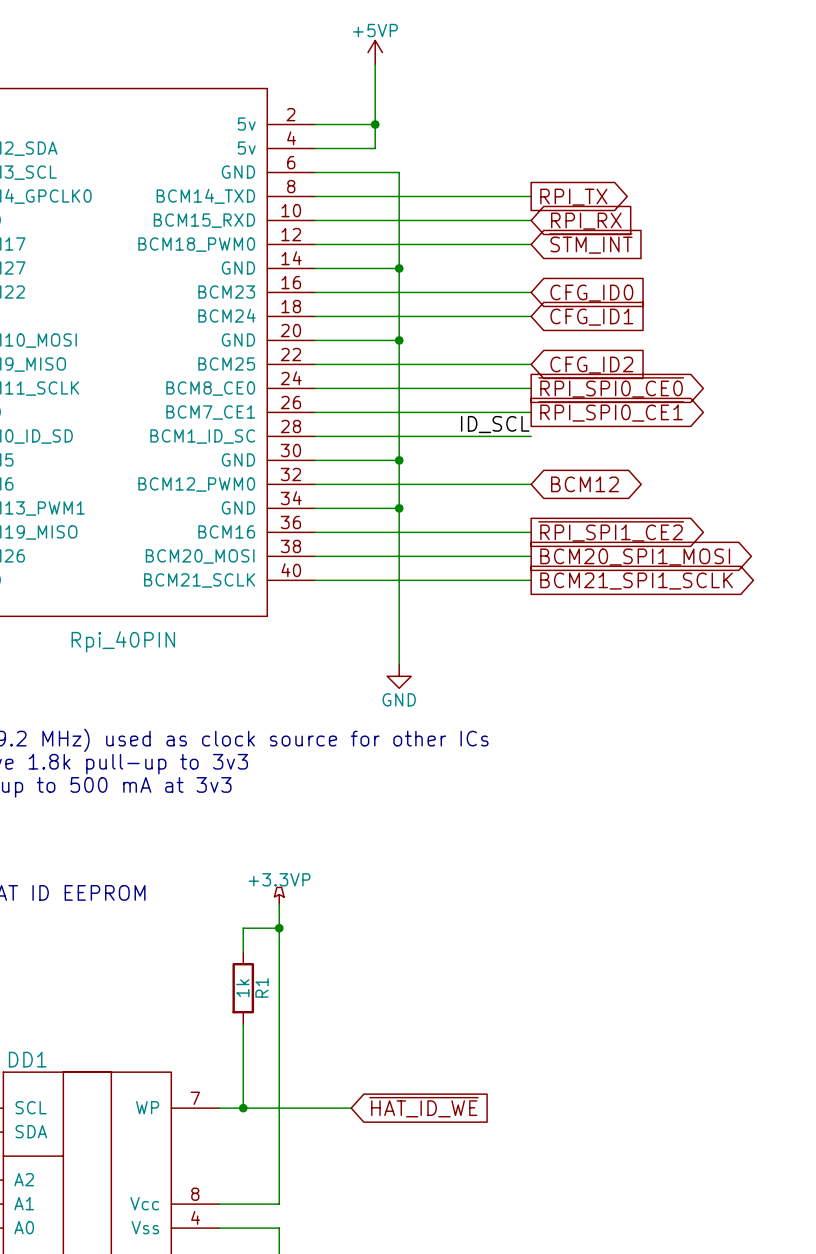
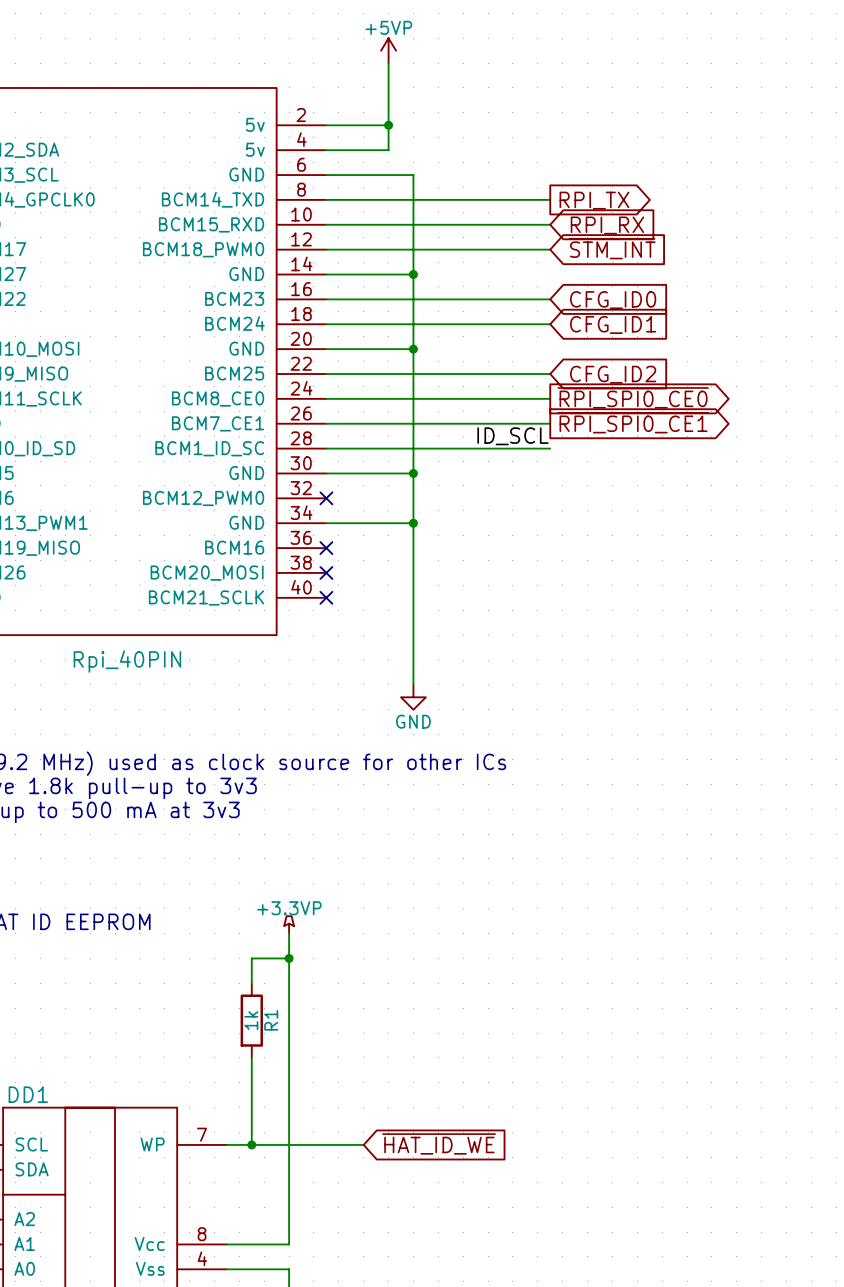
wire: (315, 484) (531, 484) -> none
no-connect mark: none -> (326, 498)
global label: BCM12 (584, 484) -> none
global label: ~{RPI_SPI1_CE2} (611, 531) -> none
wire: (315, 532) (531, 532) -> none
no-connect mark: none -> (326, 548)
wire: (315, 556) (531, 556) -> none
no-connect mark: none -> (326, 572)
global label: BCM20_SPI1_MOSI (635, 557) -> none
wire: (315, 580) (531, 580) -> none
no-connect mark: none -> (326, 597)
global label: BCM21_SPI1_SCLK (636, 581) -> none

